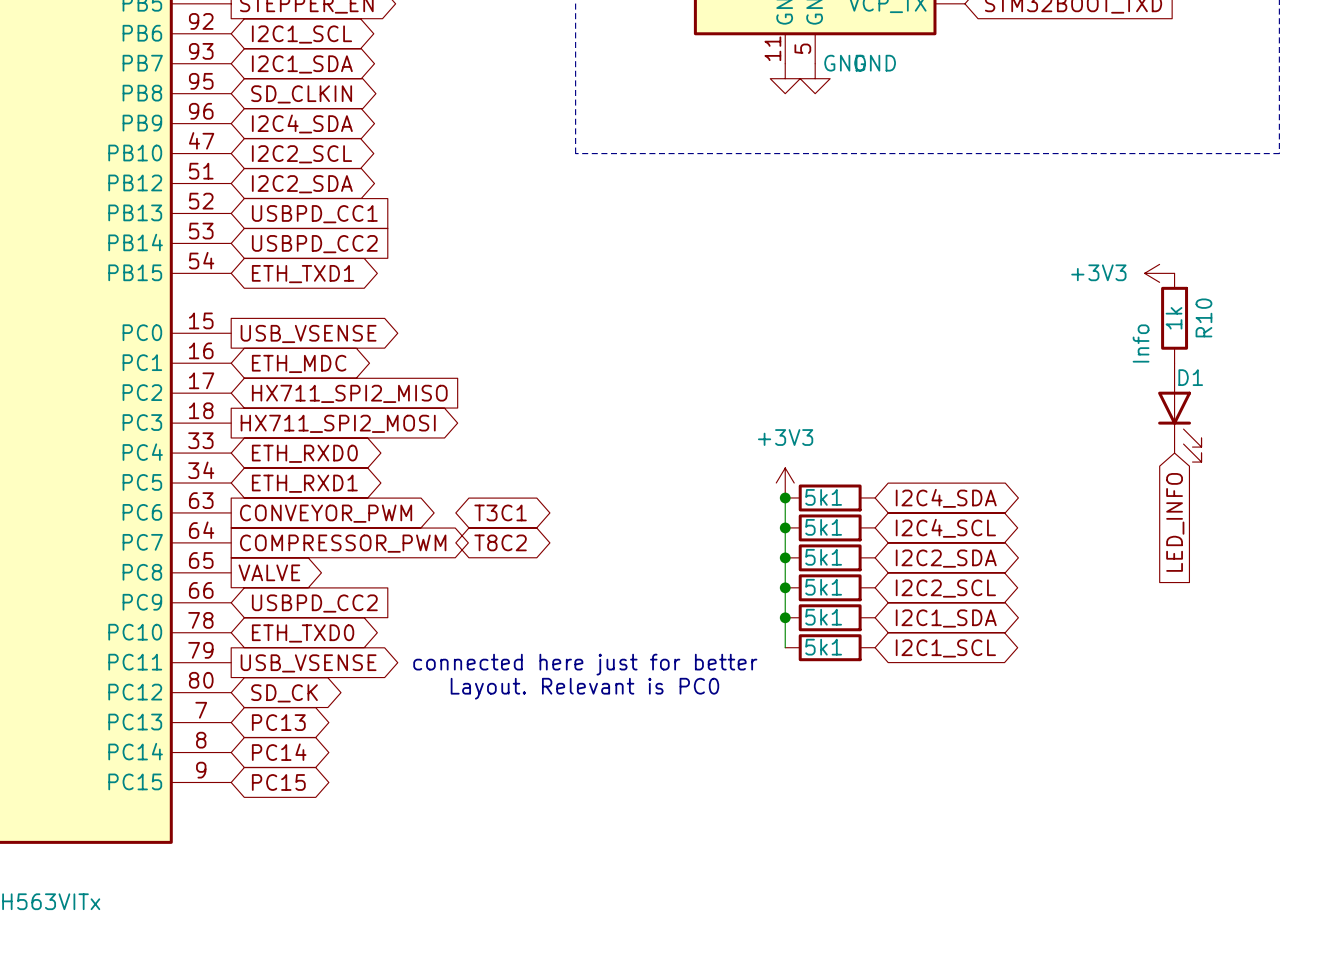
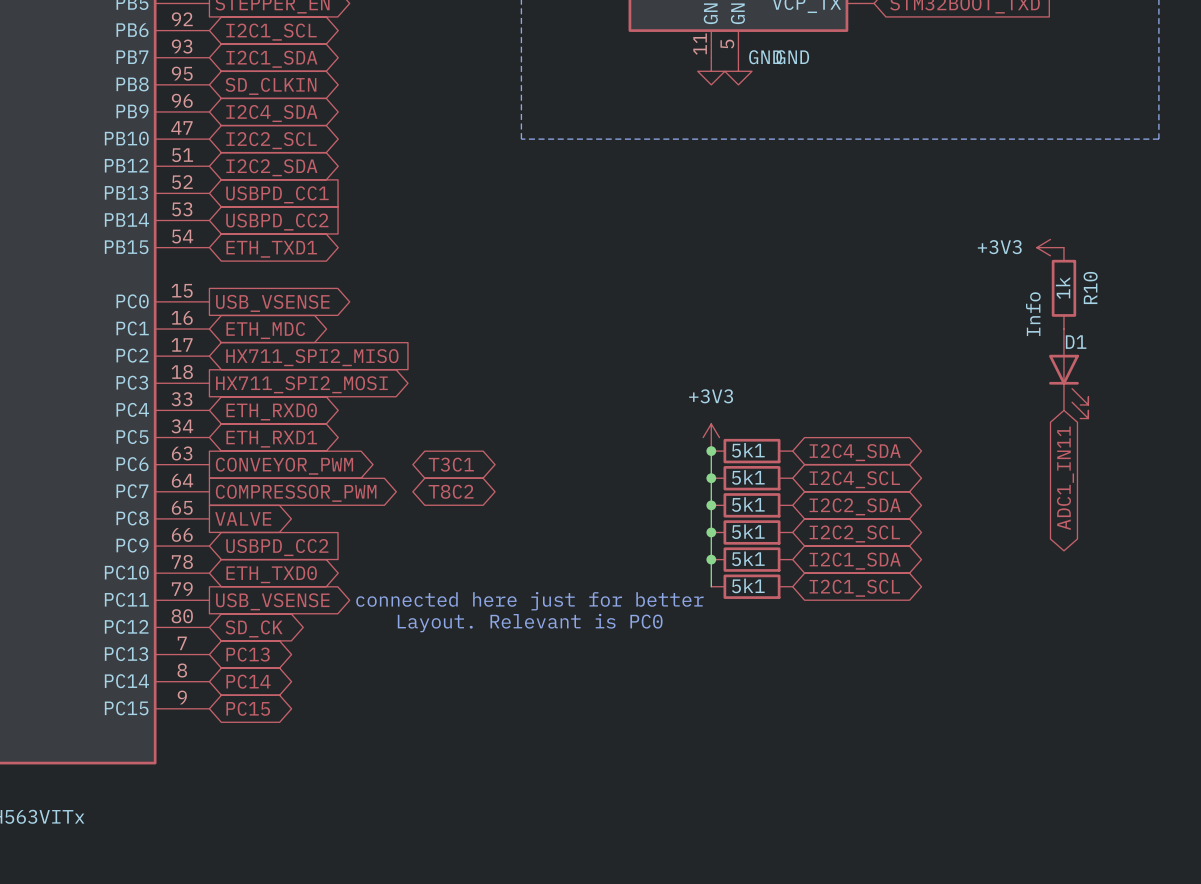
global label shape: input (1175, 522) -> bidirectional (1065, 478)
global label: LED_INFO (1175, 522) -> ADC1_IN11 (1065, 478)

